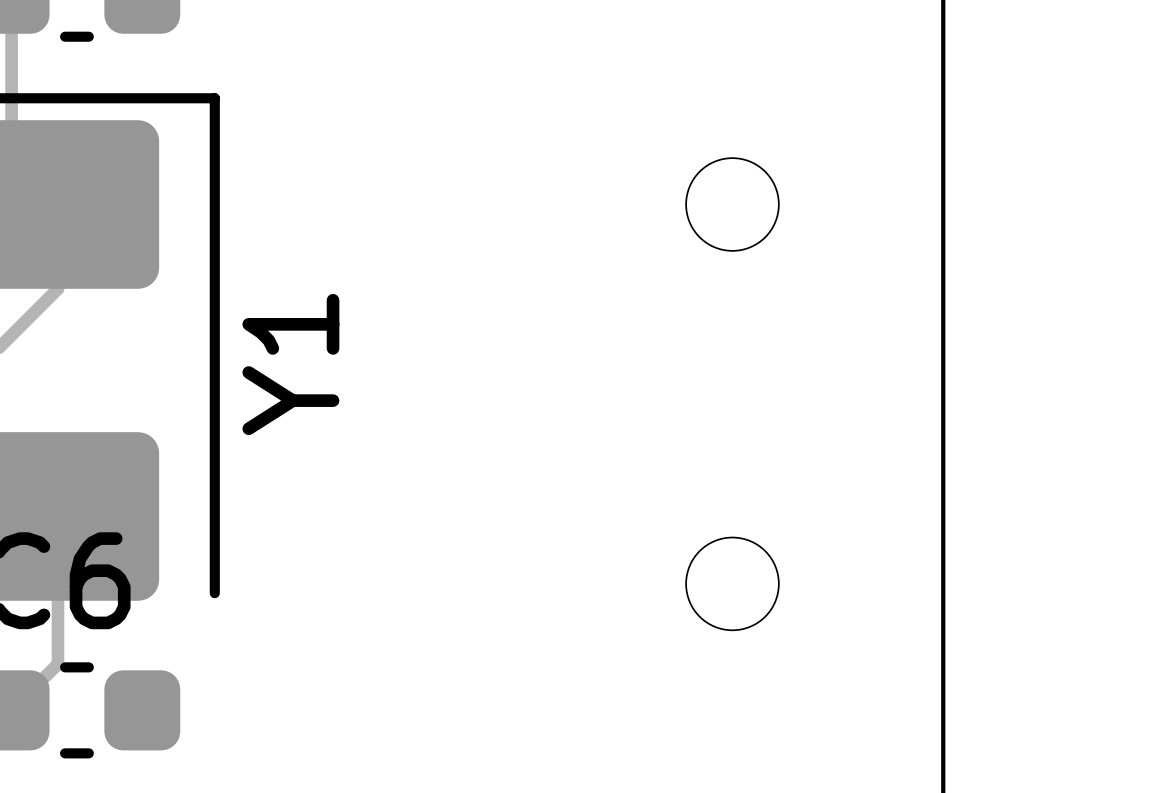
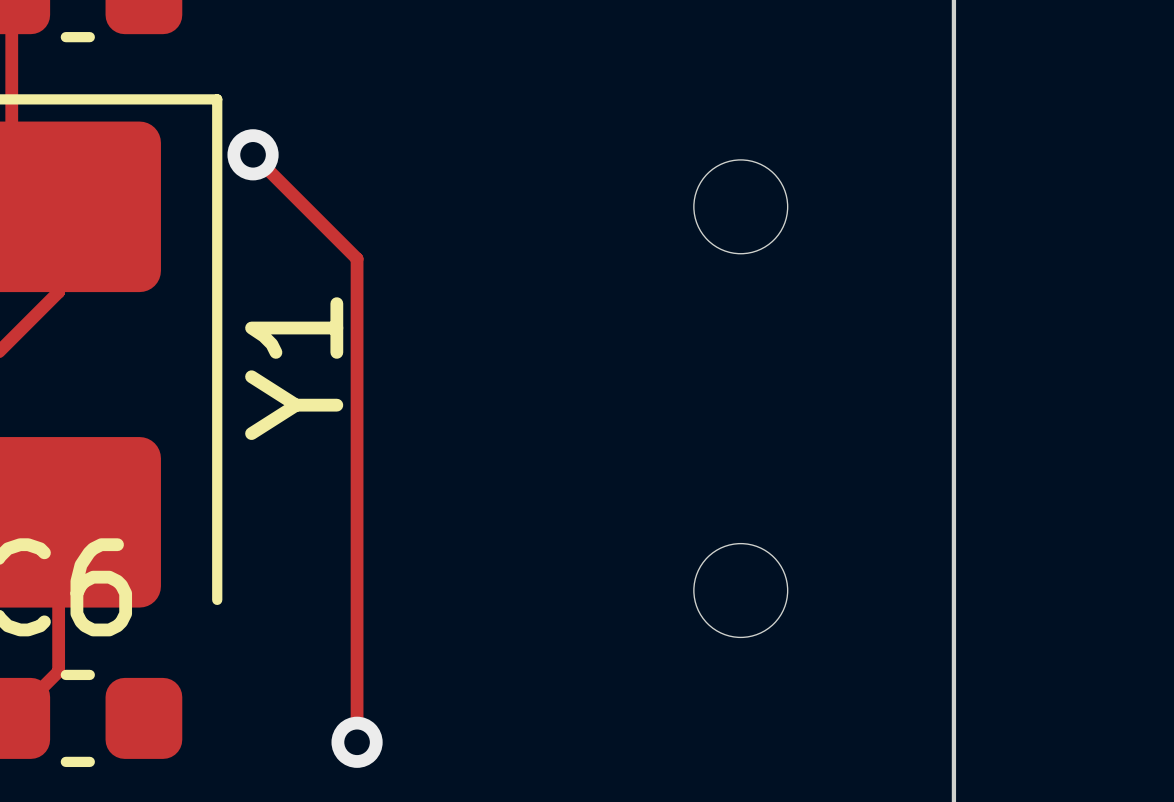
track: none -> (253, 154) (357, 258) (357, 742)
via: none -> (253, 154)
via: none -> (357, 742)

